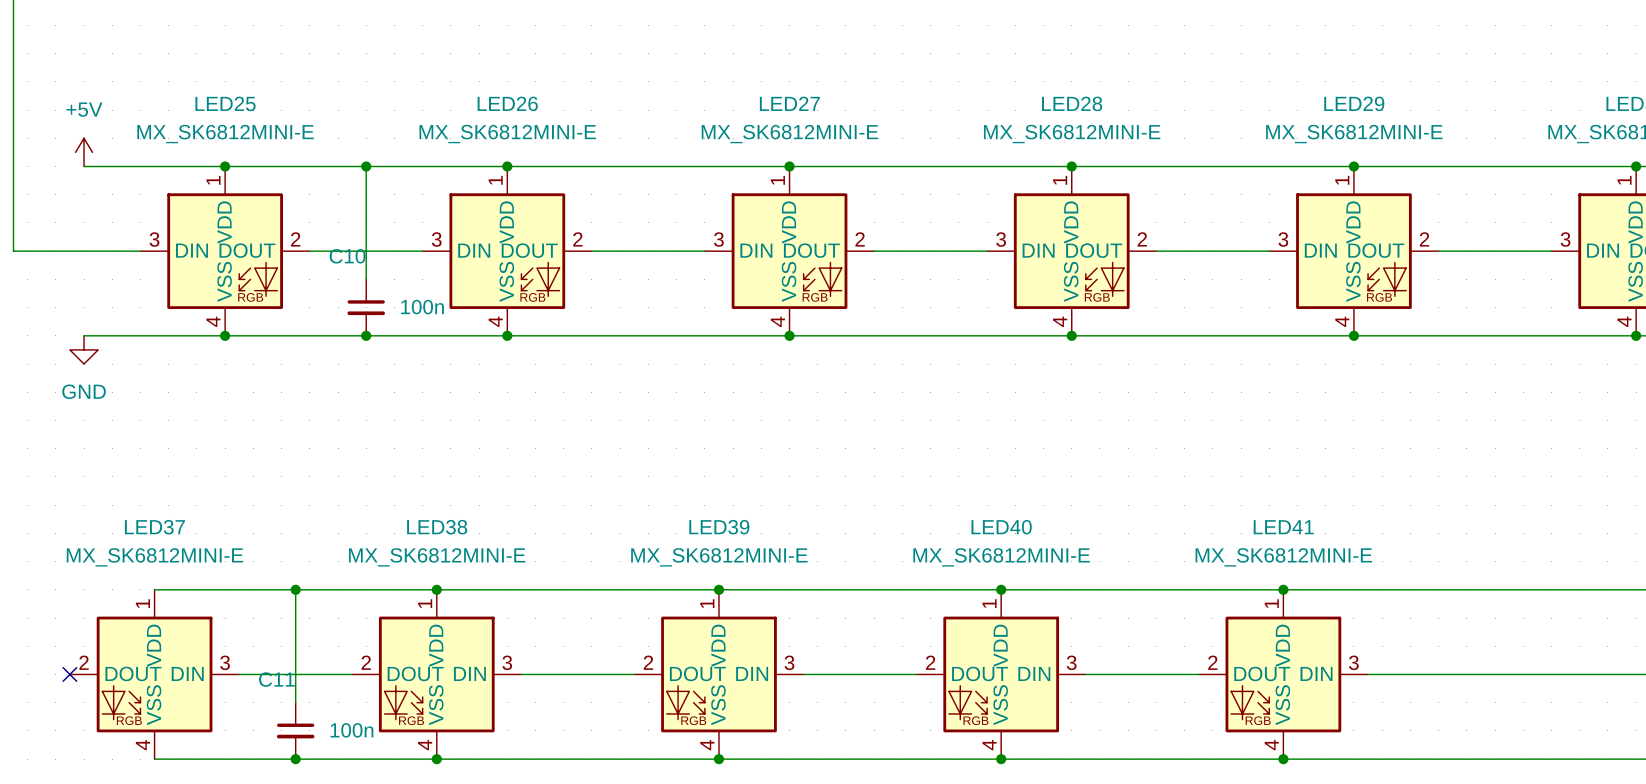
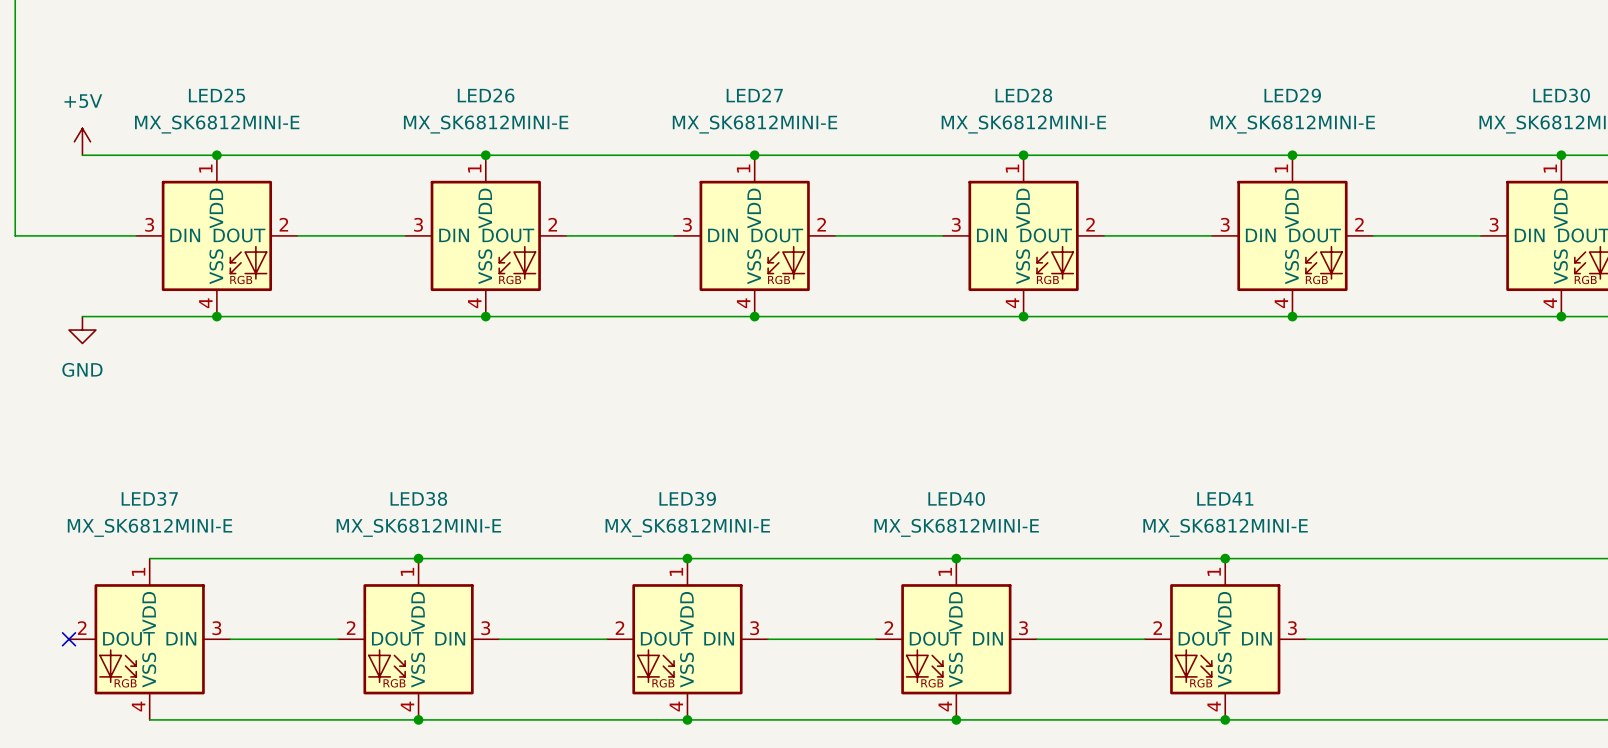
wire: (366, 166) (366, 279) -> none
junction: (366, 166) -> none
C10: 100n (366, 307) -> none
junction: (366, 335) -> none
wire: (295, 589) (295, 702) -> none
junction: (295, 589) -> none
C11: 100n (295, 730) -> none
junction: (295, 759) -> none

